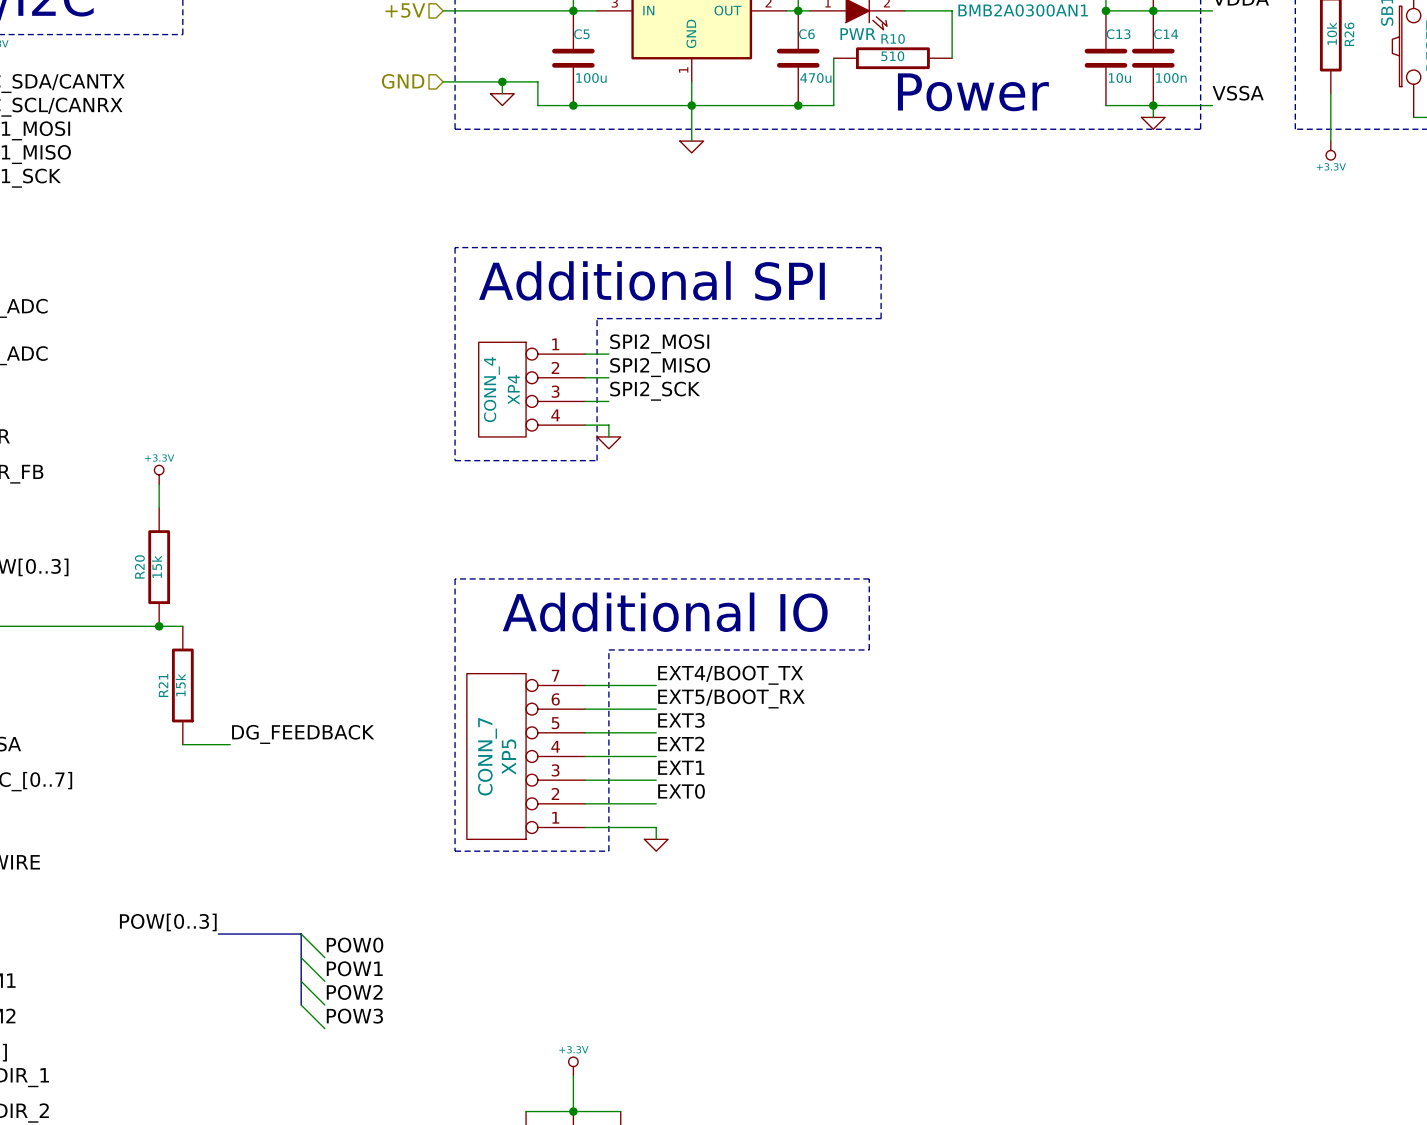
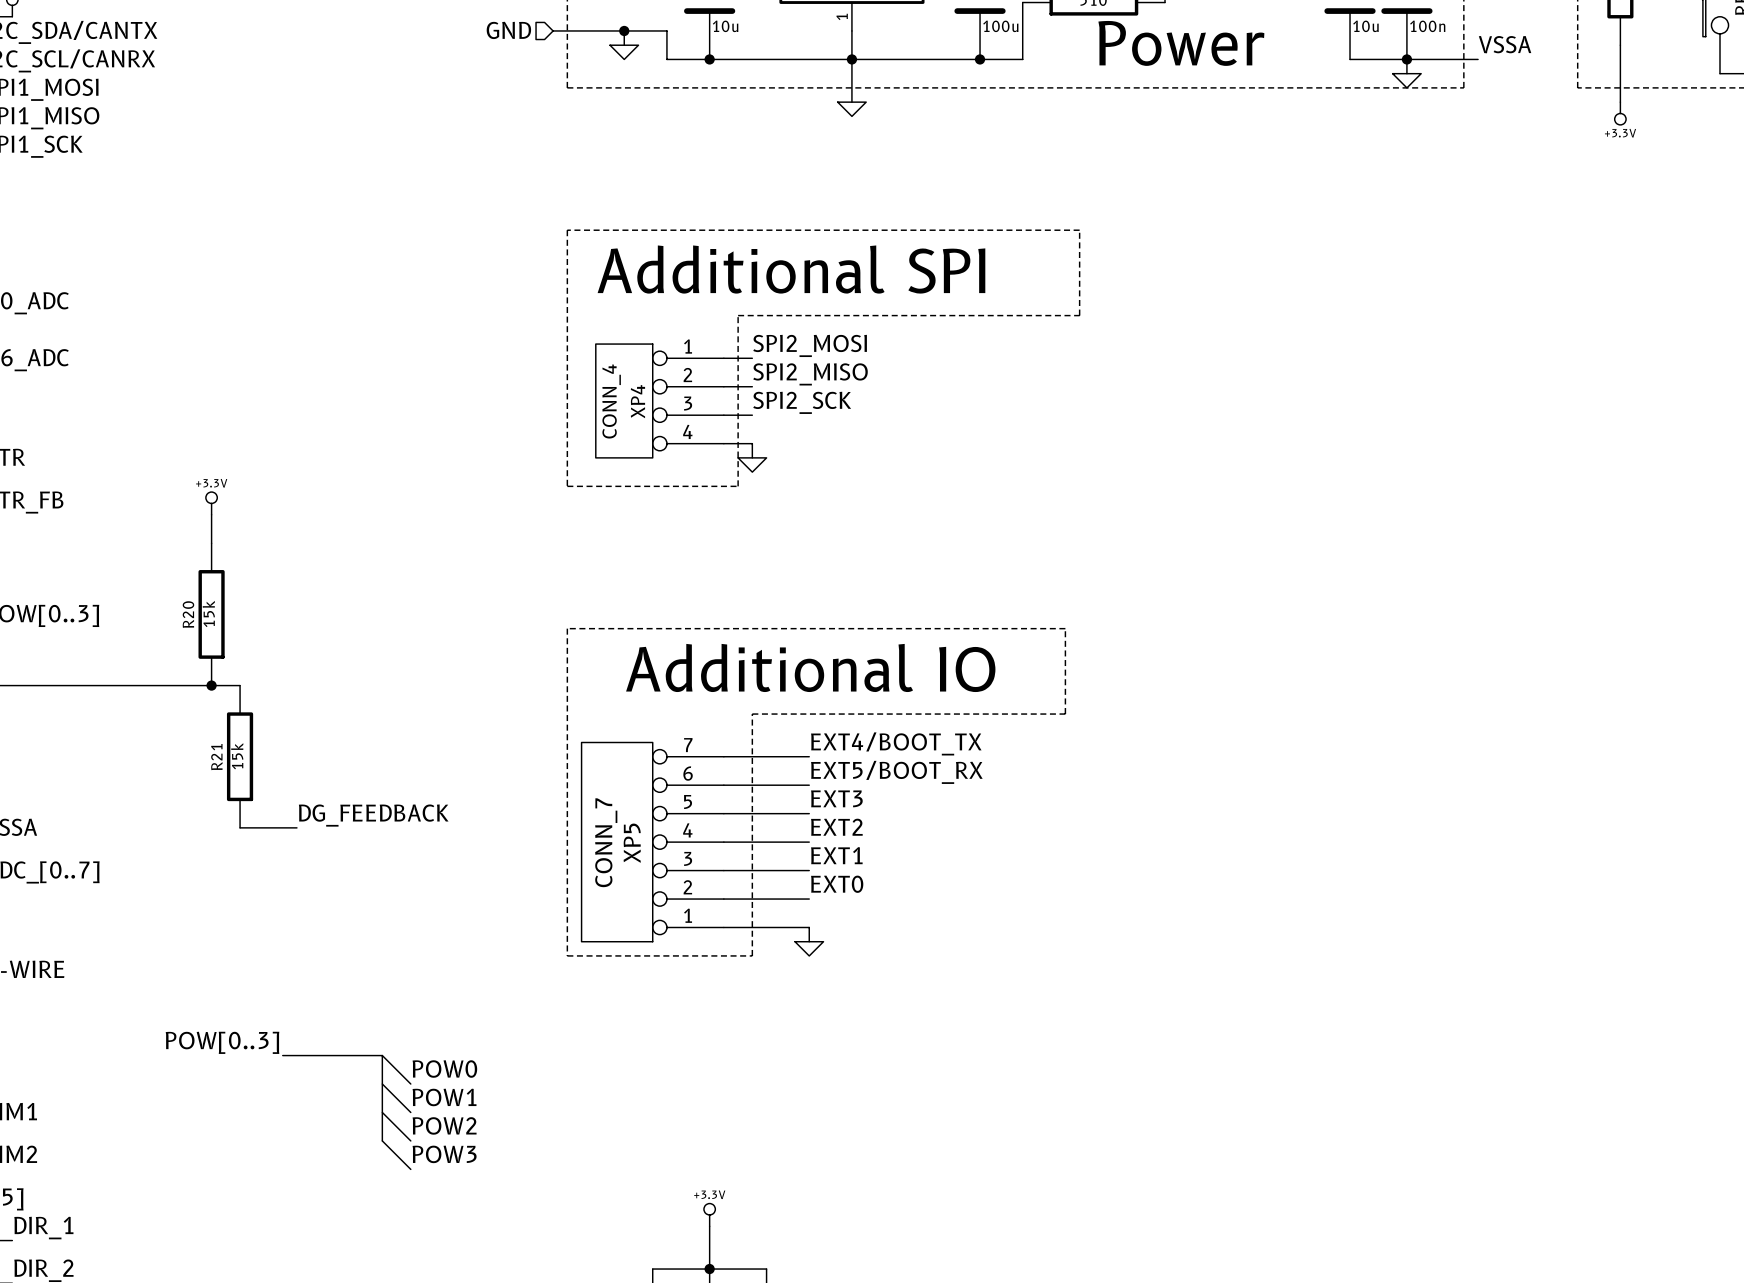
C5 value: 100u (591, 78) -> 10u (725, 26)
C6 value: 470u (815, 78) -> 100u (1000, 26)

